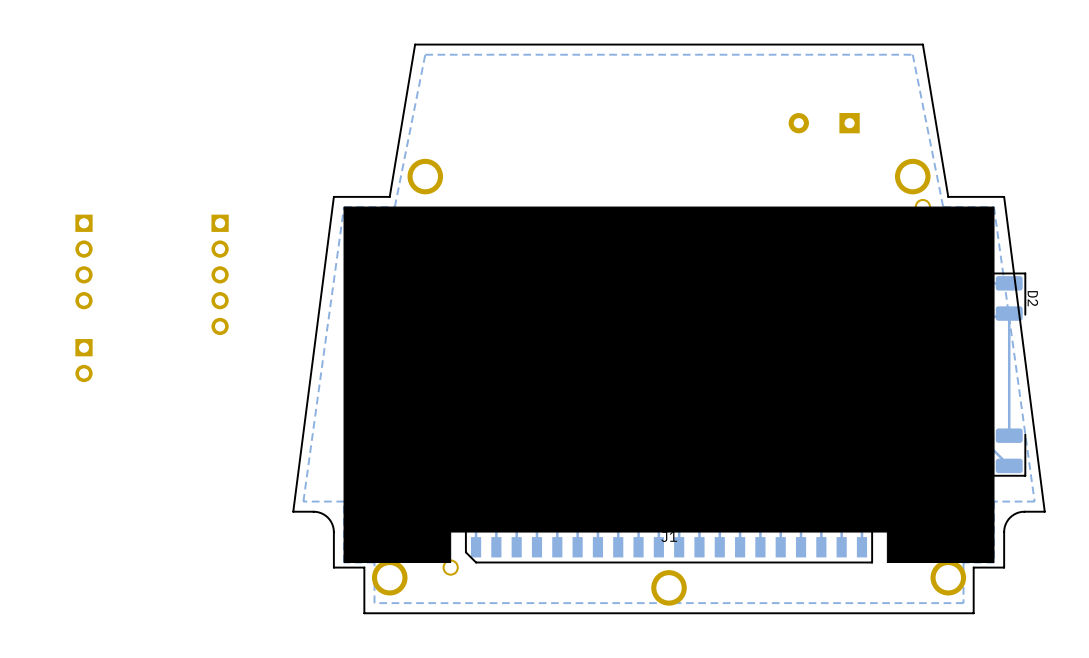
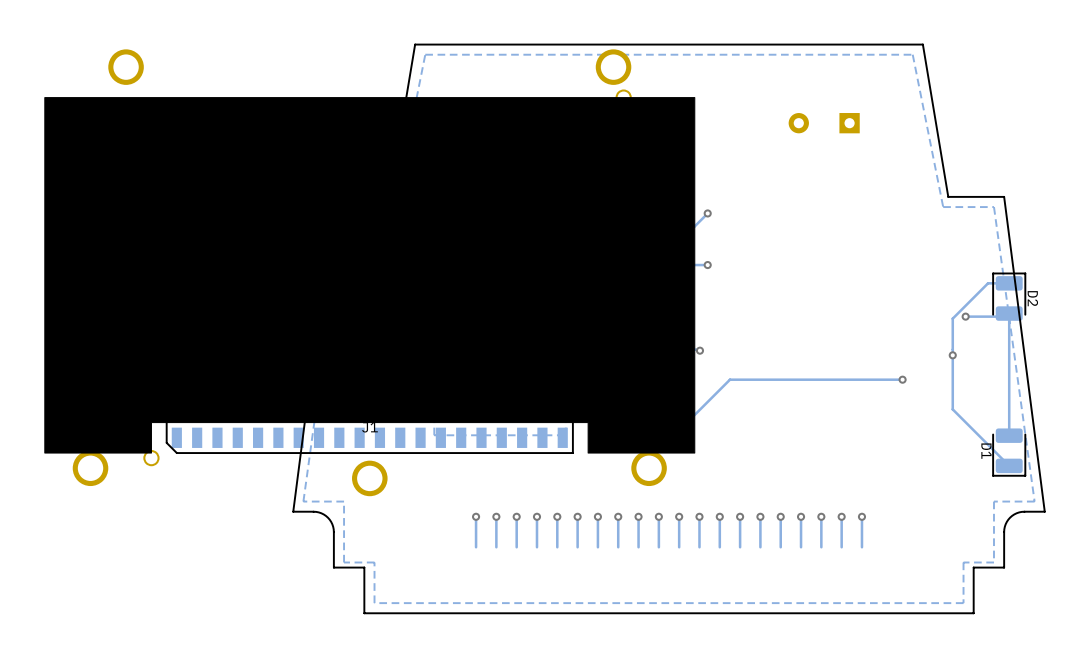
J1 position: (669, 382) -> (369, 272)

